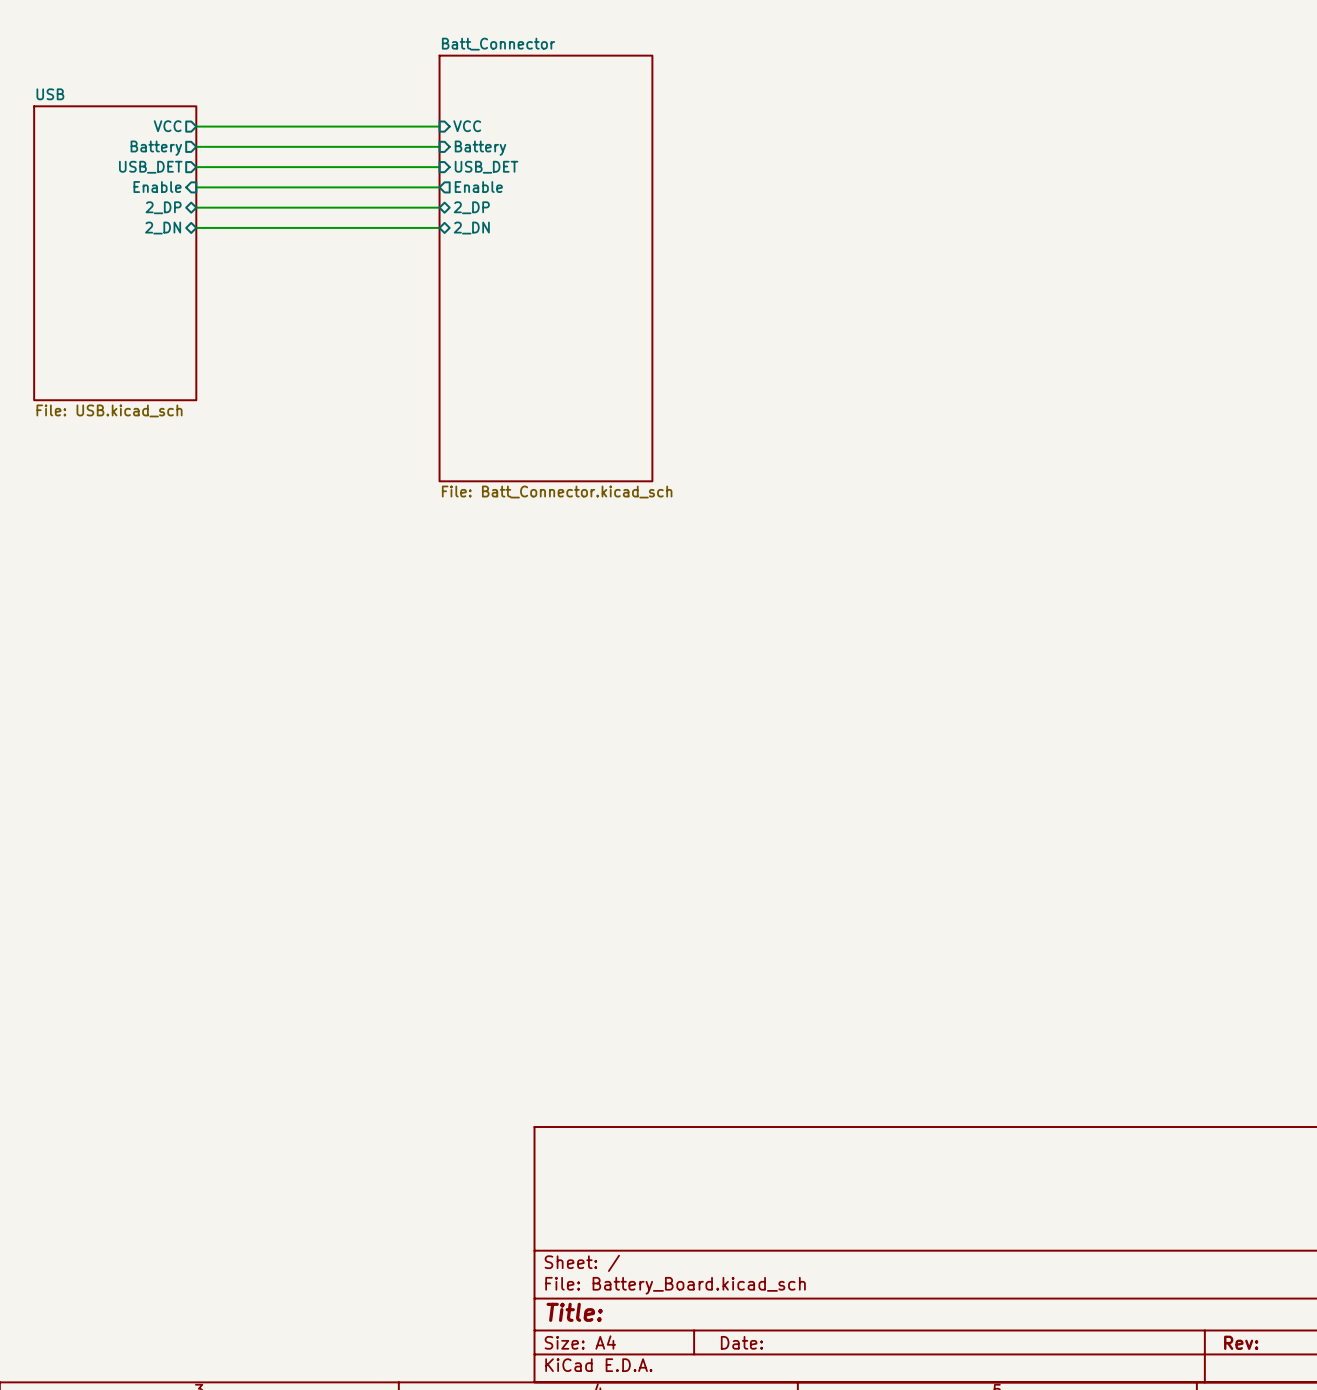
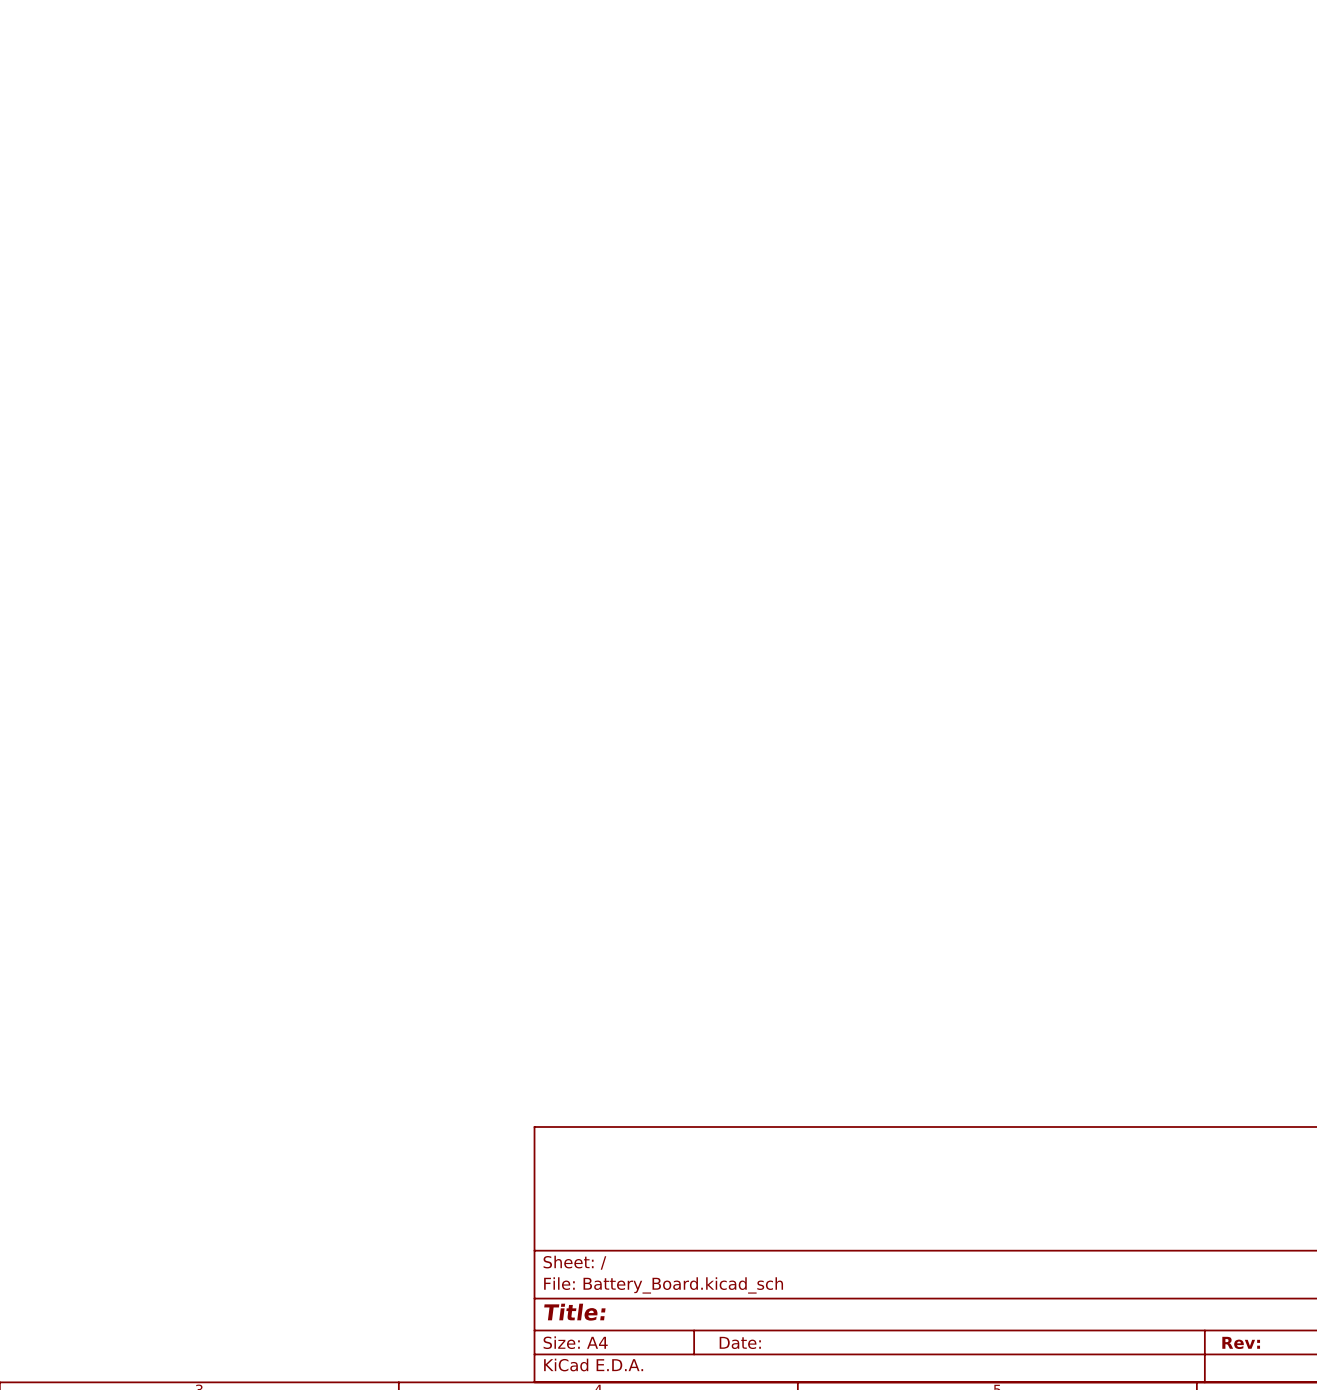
sheet pin: VCC (167, 126) -> none
wire: (196, 126) (439, 126) -> none
sheet pin: VCC (467, 126) -> none
wire: (196, 146) (439, 146) -> none
sheet pin: Battery (156, 148) -> none
sheet pin: Battery (480, 148) -> none
sheet pin: USB_DET (150, 167) -> none
wire: (196, 167) (439, 167) -> none
sheet pin: USB_DET (486, 167) -> none
sheet pin: Enable (157, 187) -> none
wire: (196, 187) (439, 187) -> none
sheet pin: Enable (478, 187) -> none
sheet pin: 2_DP (163, 207) -> none
wire: (196, 207) (439, 207) -> none
sheet pin: 2_DP (471, 207) -> none
wire: (196, 227) (439, 227) -> none
sheet pin: 2_DN (163, 228) -> none
sheet pin: 2_DN (471, 228) -> none
sheet USB: File: USB.kicad_sch (115, 253) -> none
sheet Batt_Connector: File: Batt_Connector.kicad_sch (545, 268) -> none

